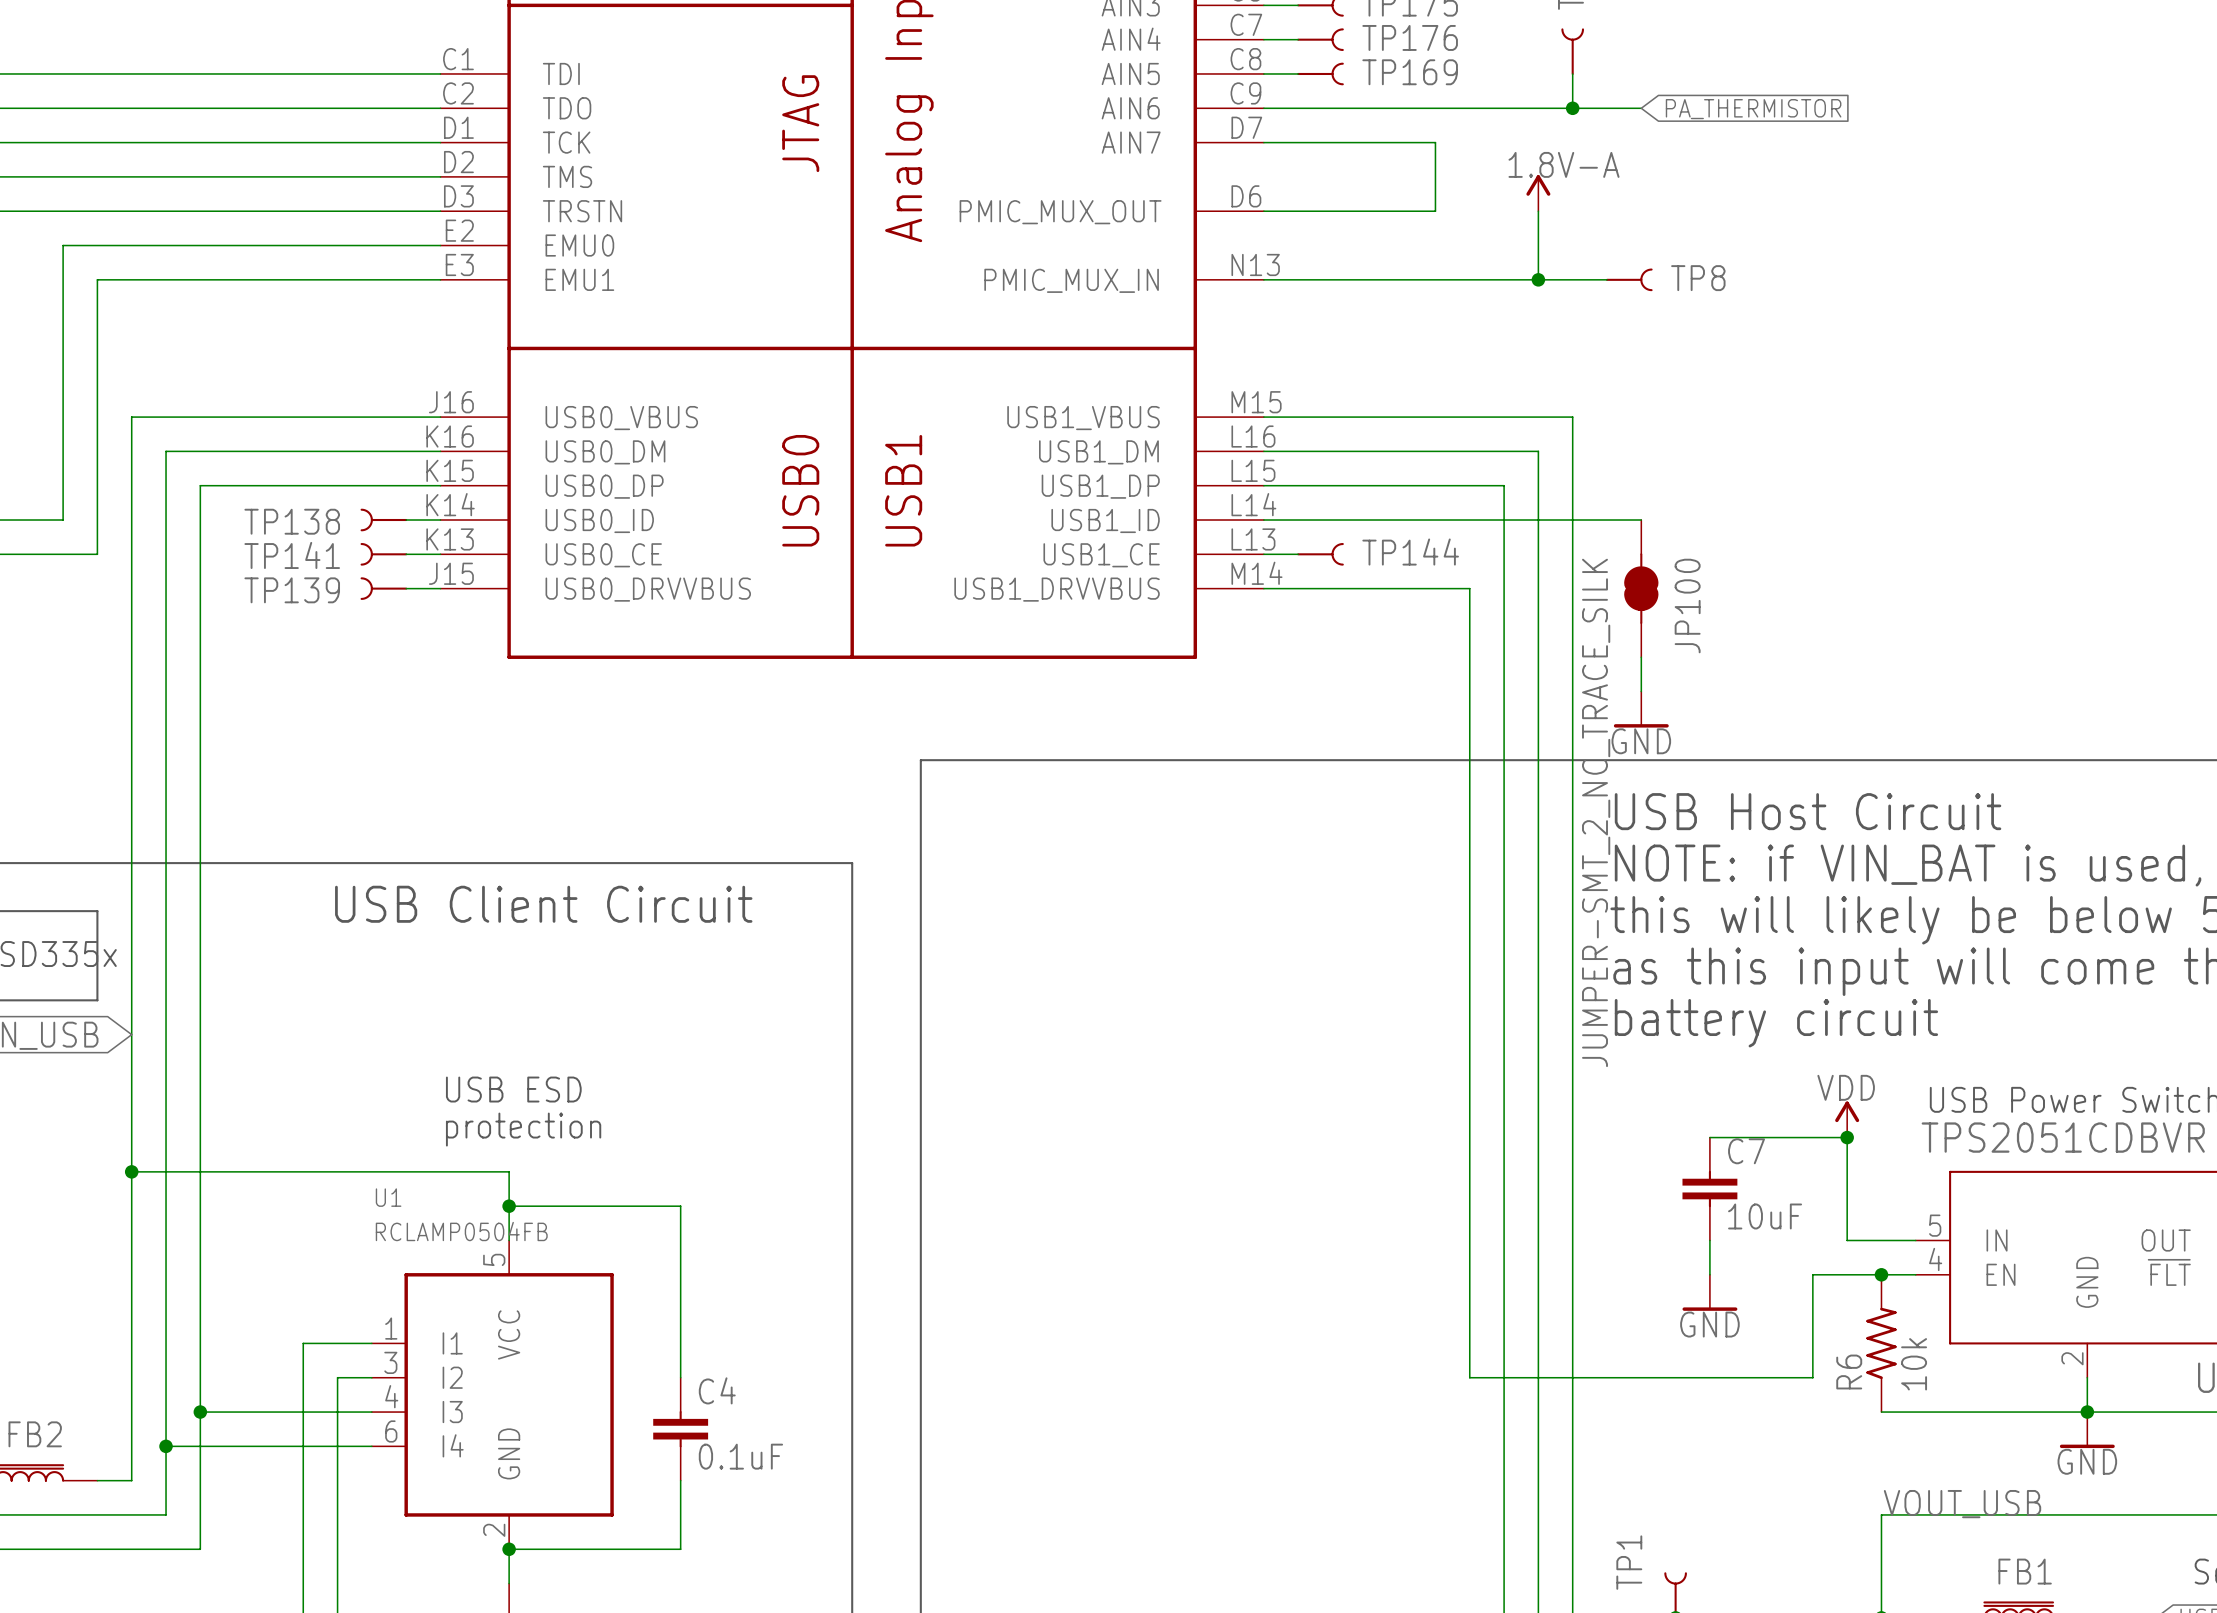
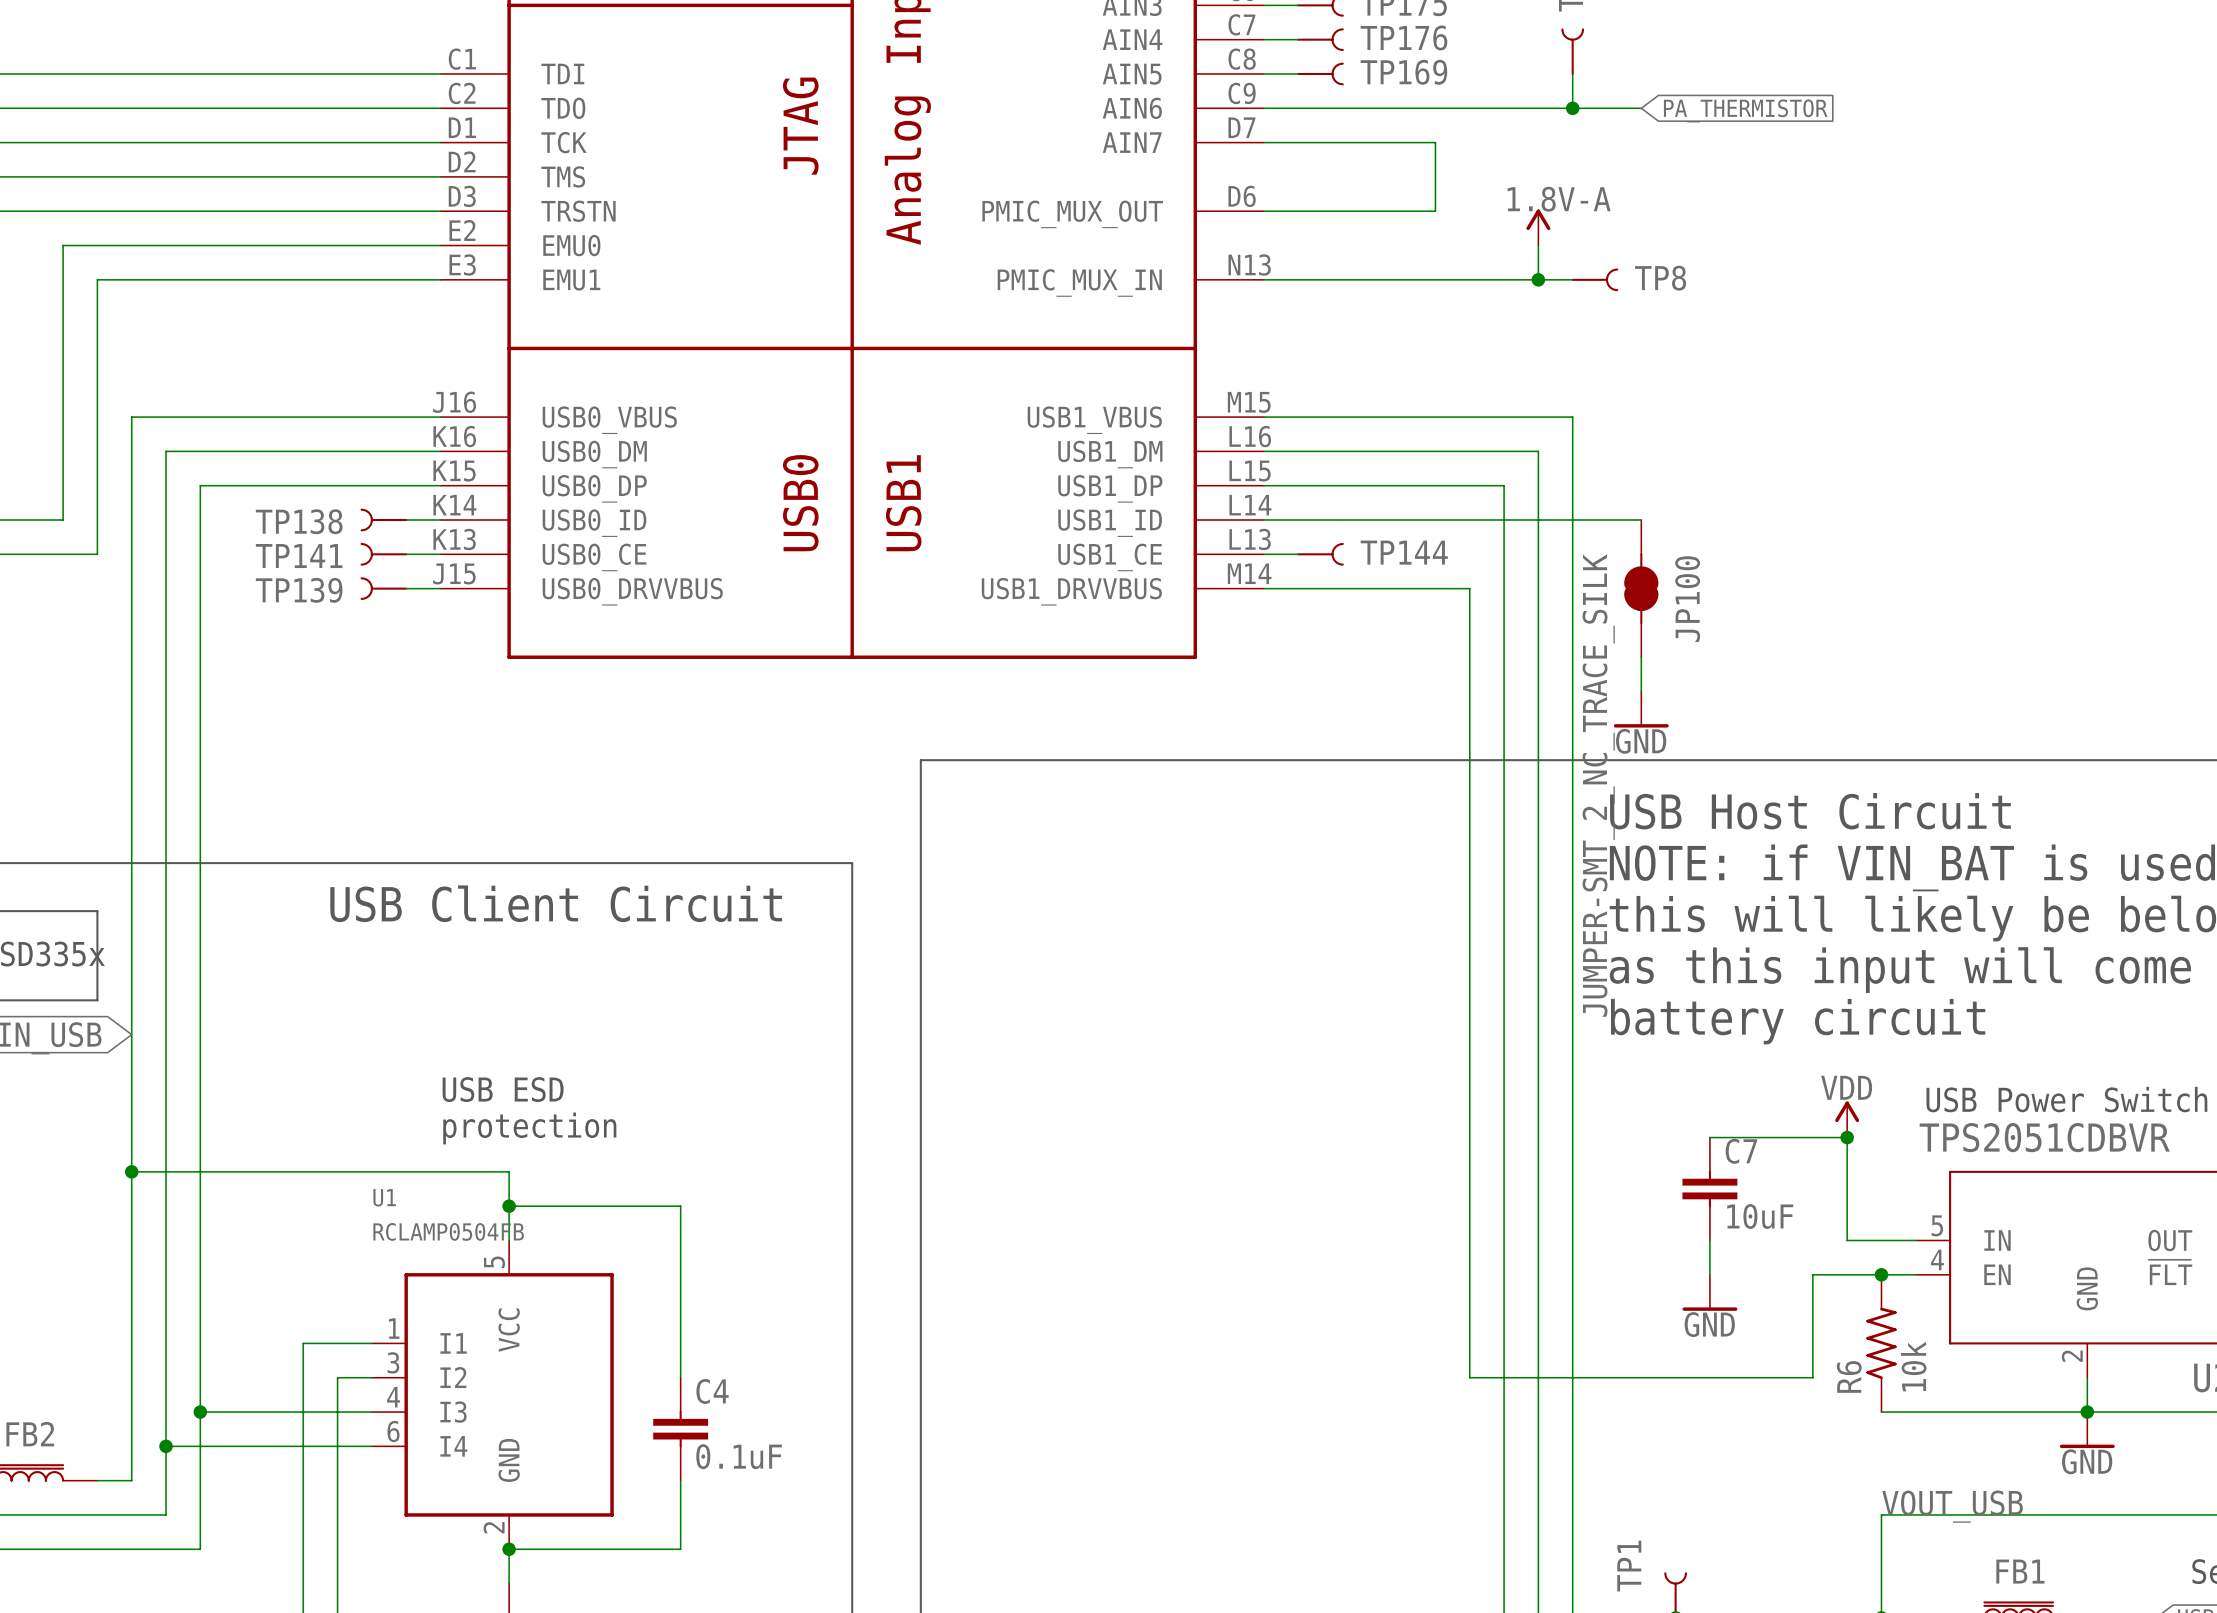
power symbol position: 1.8V-A (1538, 193) -> 1.8V-A (1538, 227)
TP8 position: (1629, 279) -> (1594, 279)

